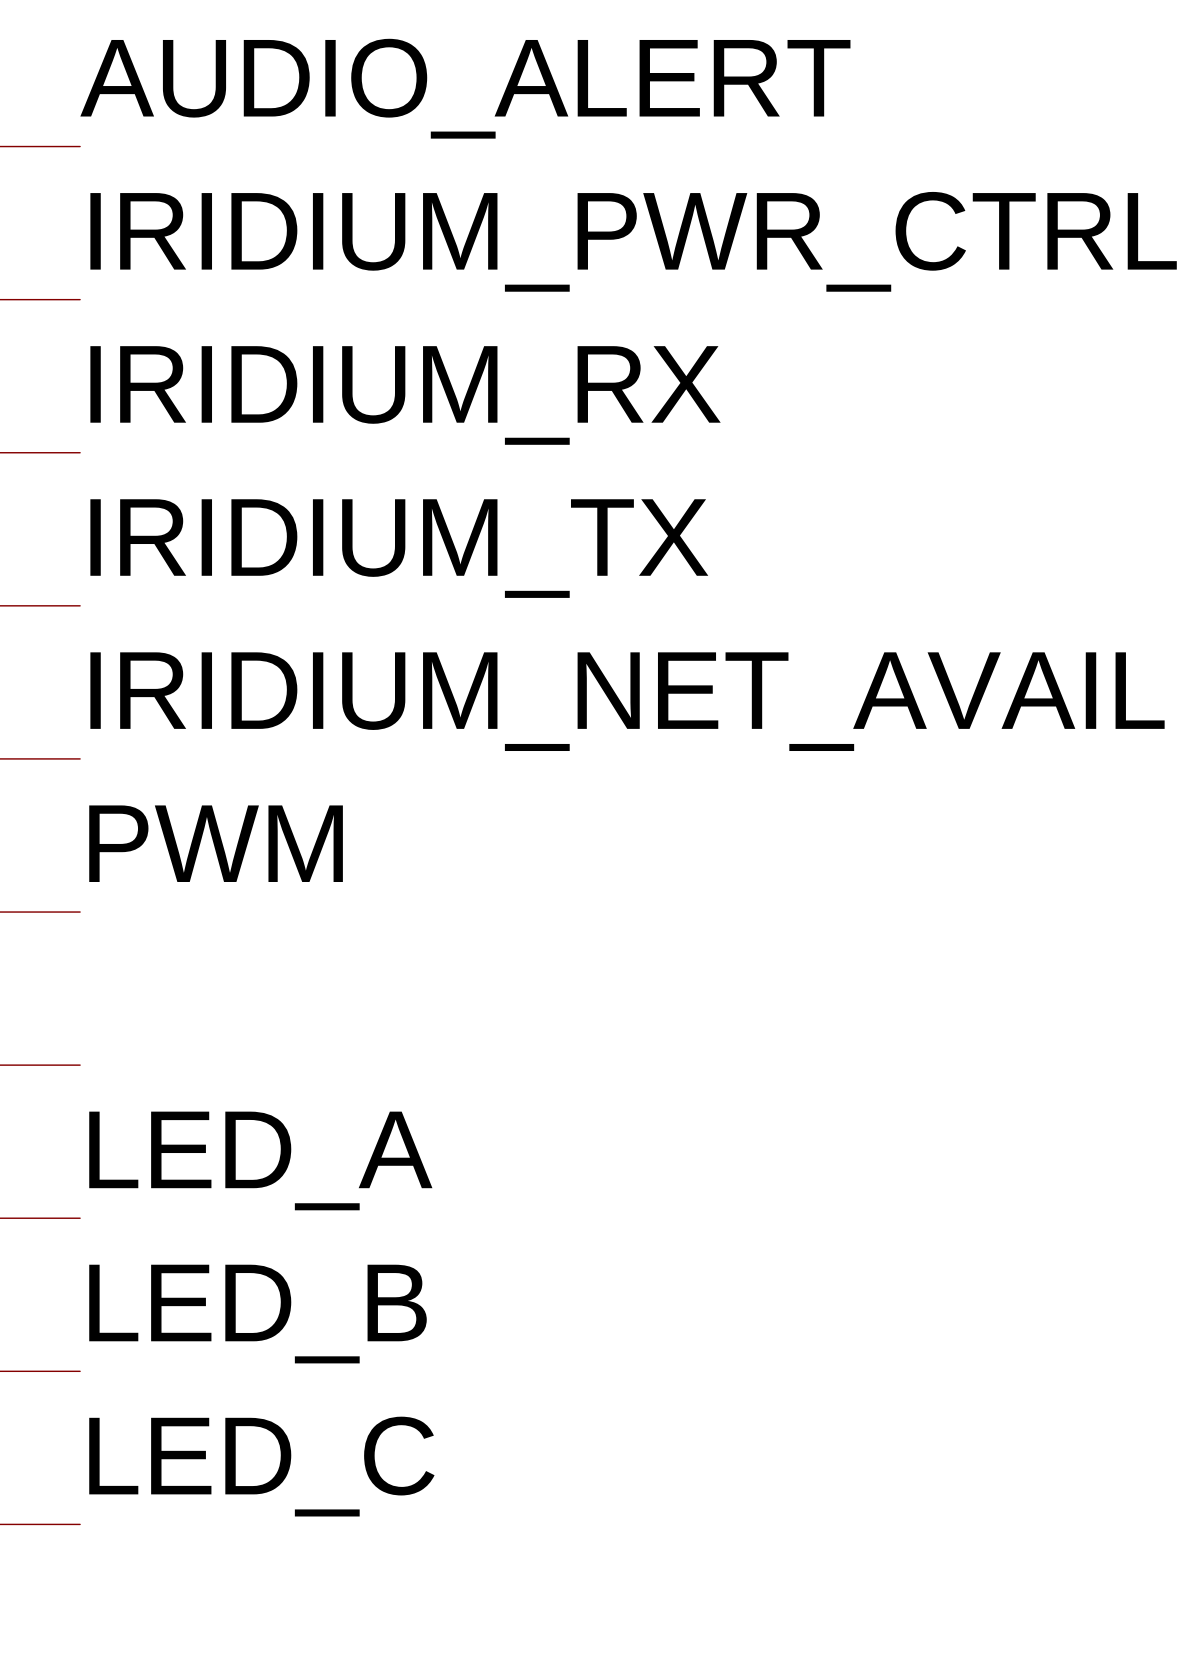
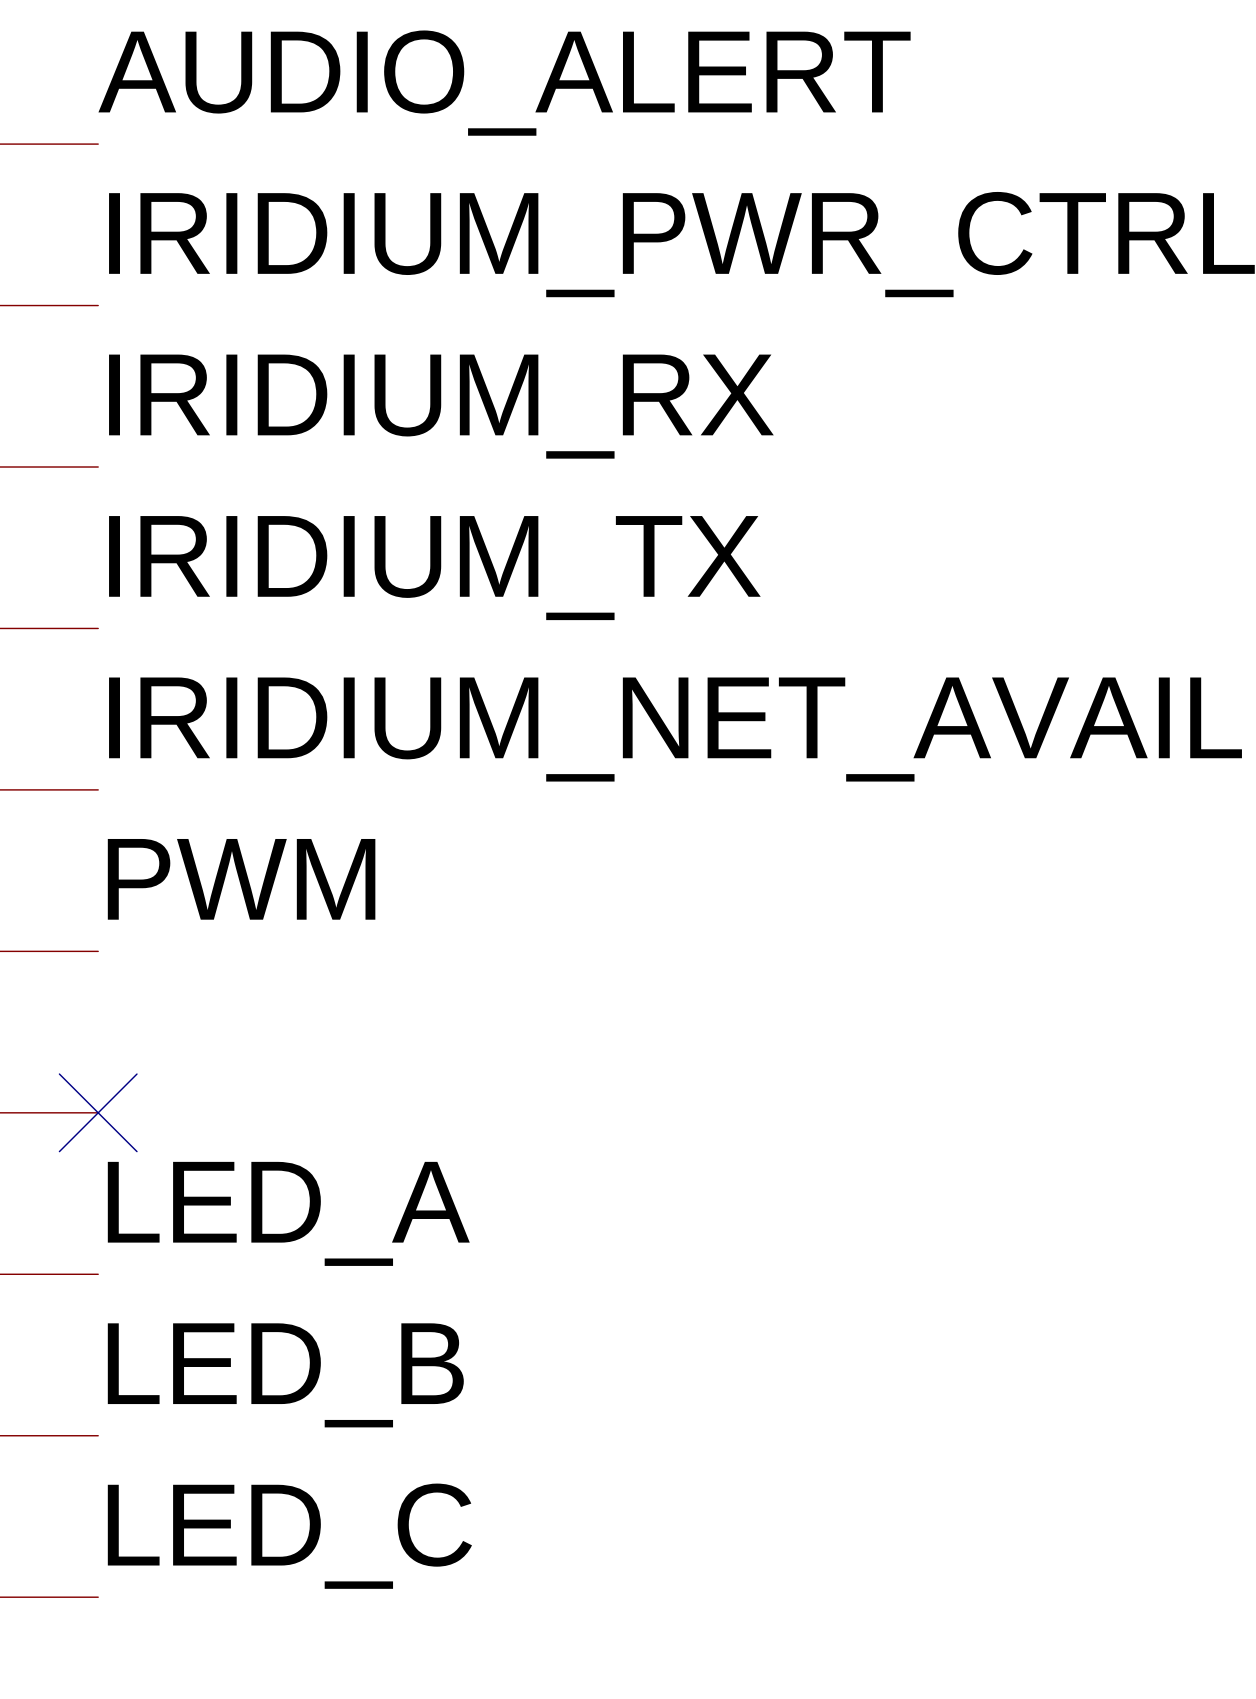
no-connect mark: none -> (98, 1112)

